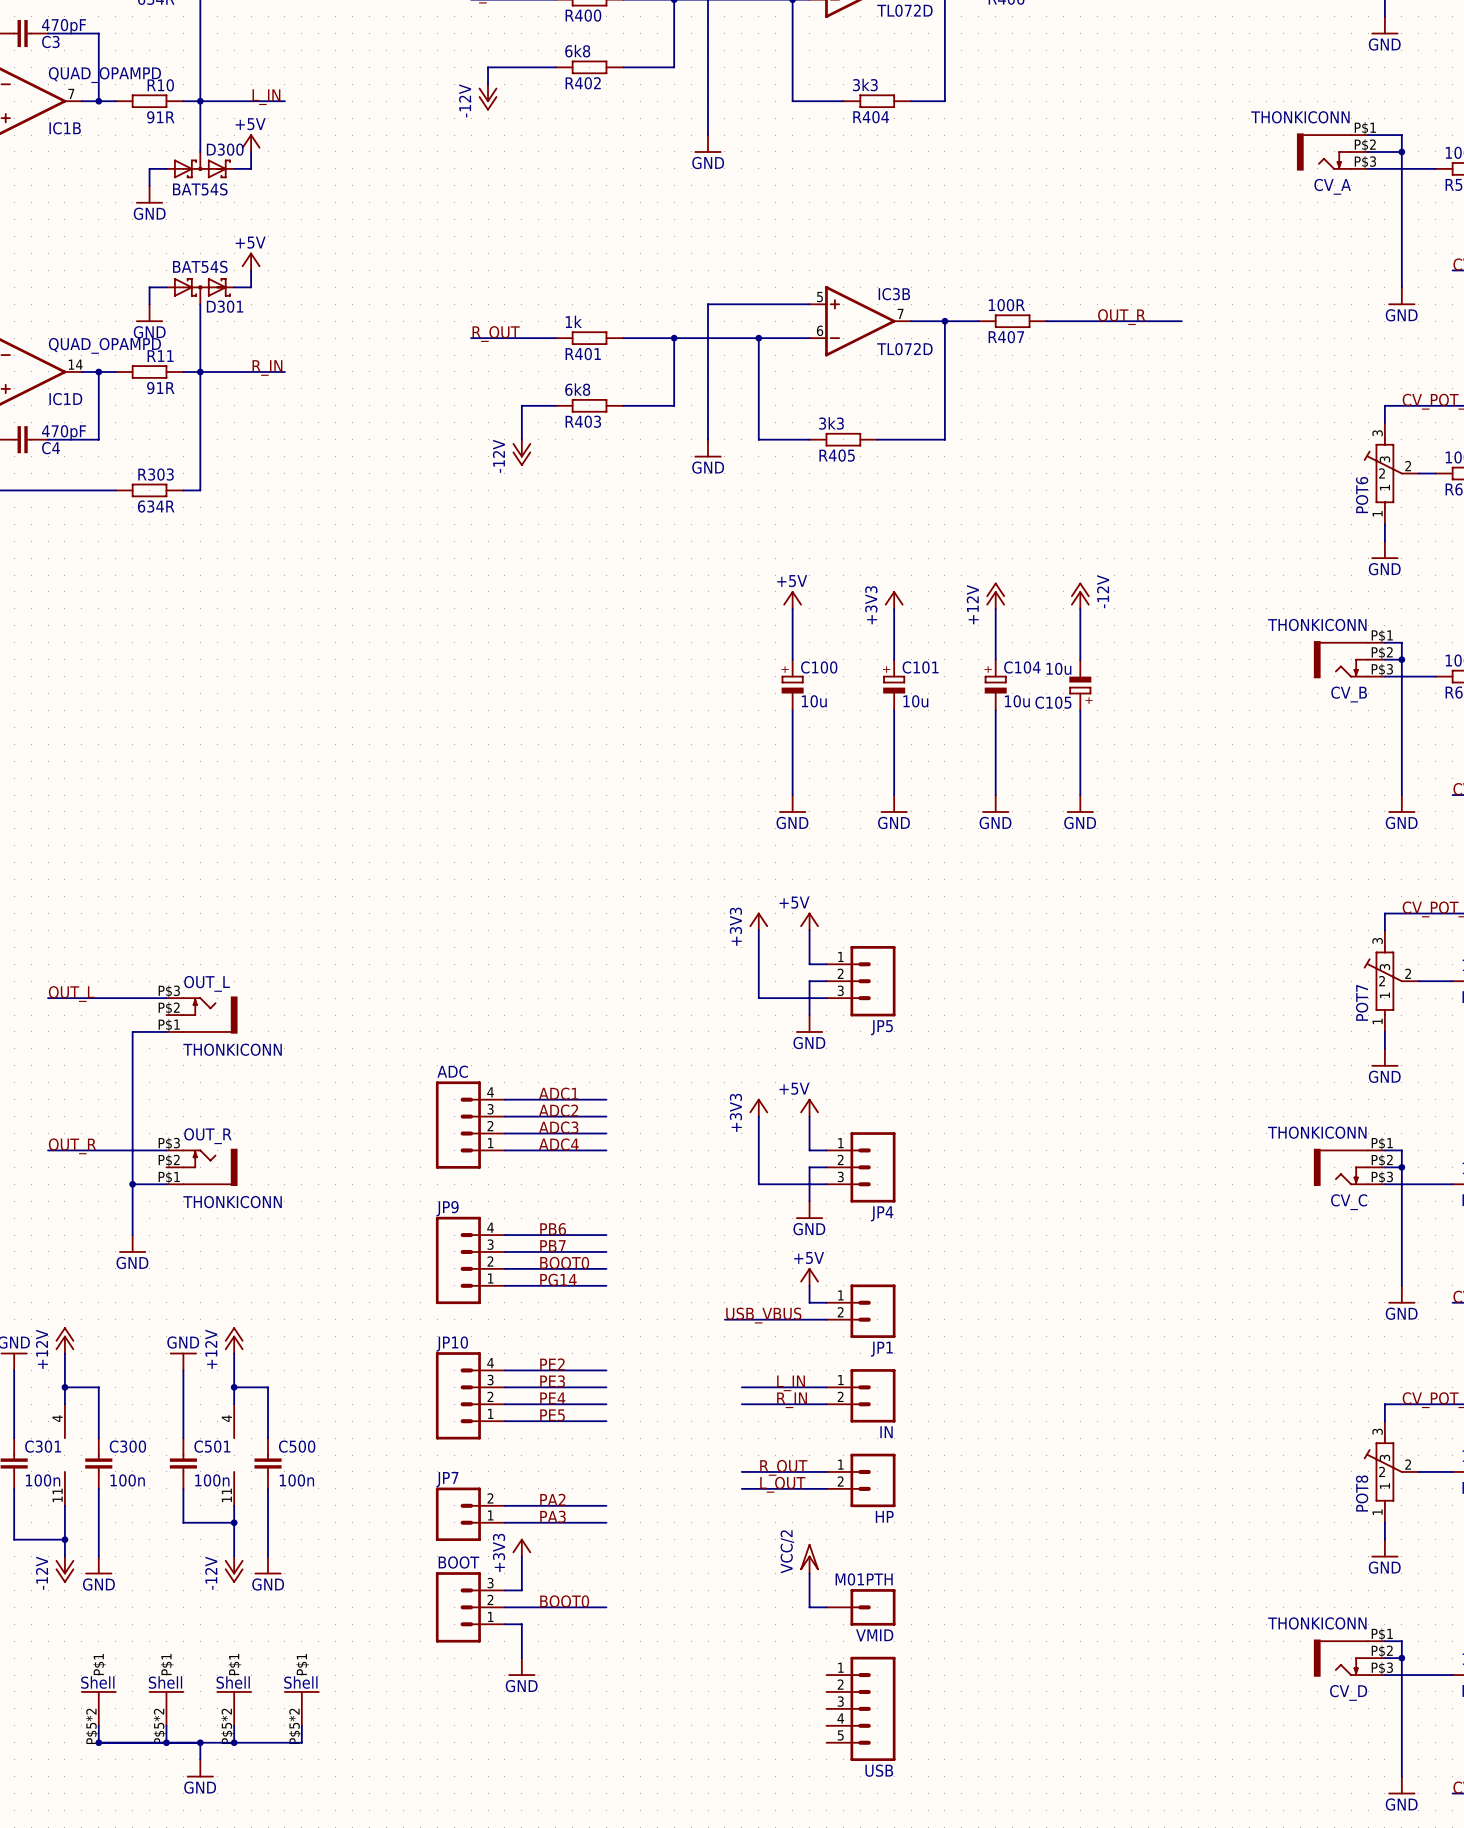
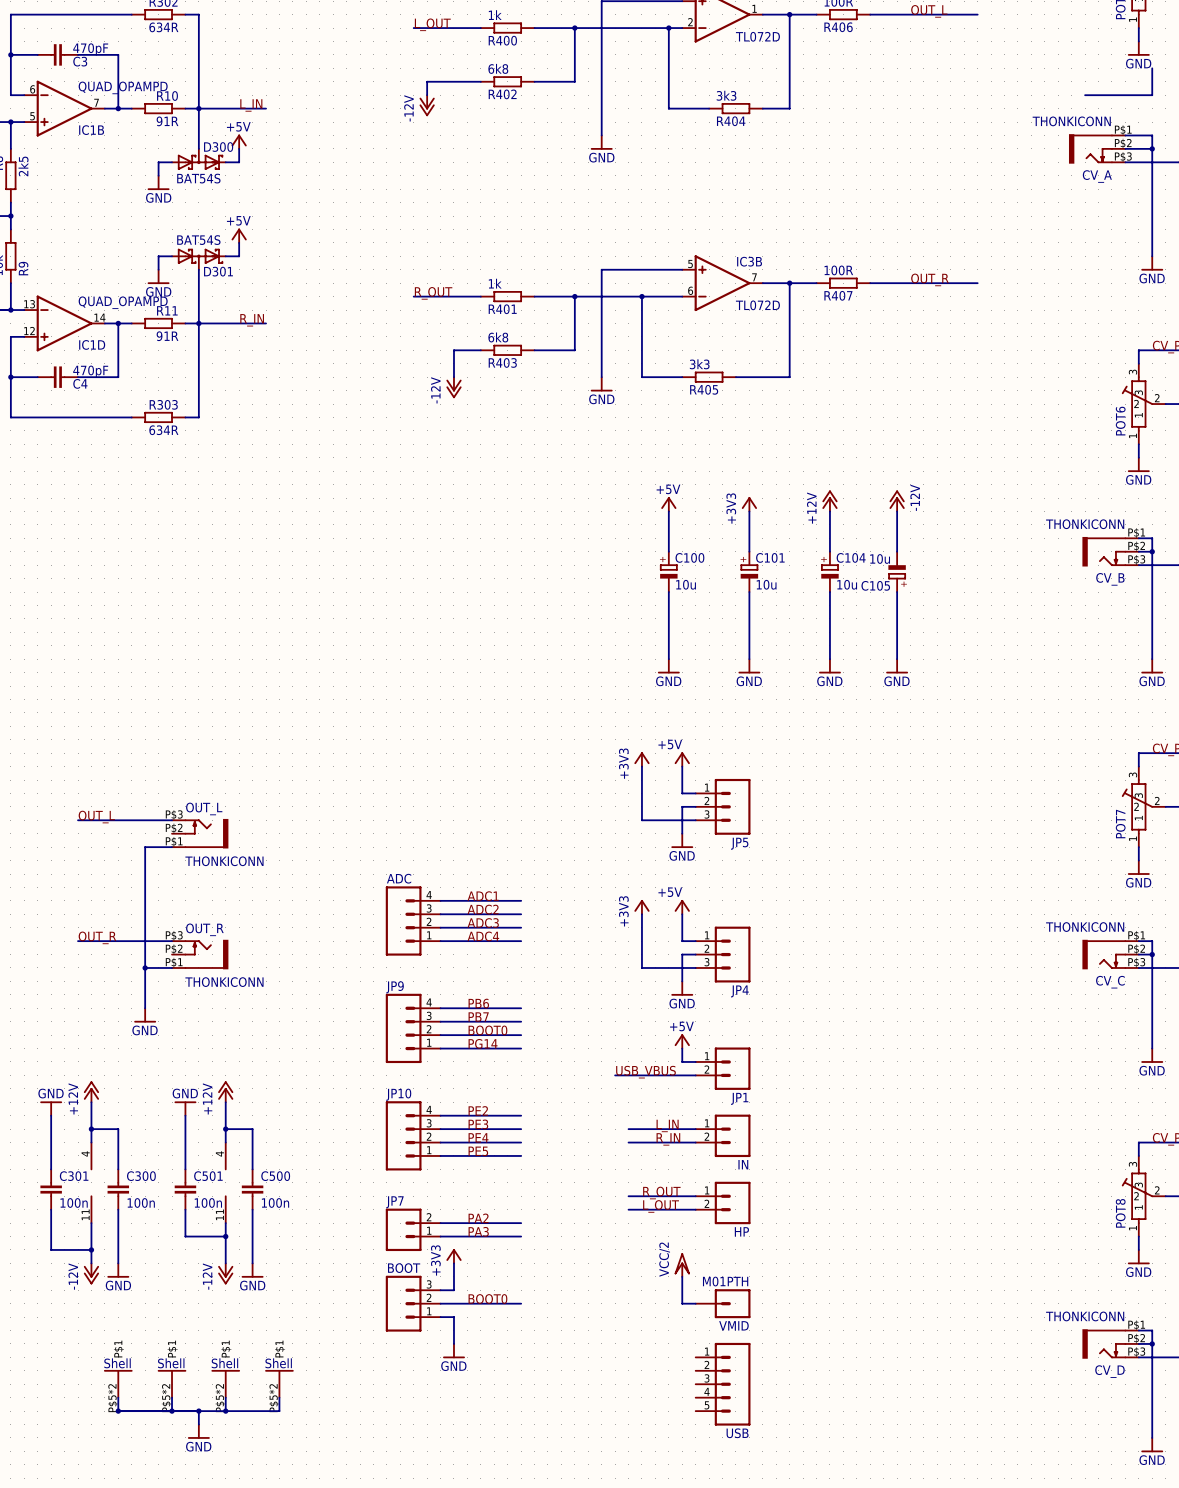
wire: none -> (1152, 68) (1152, 95) (1085, 95)

